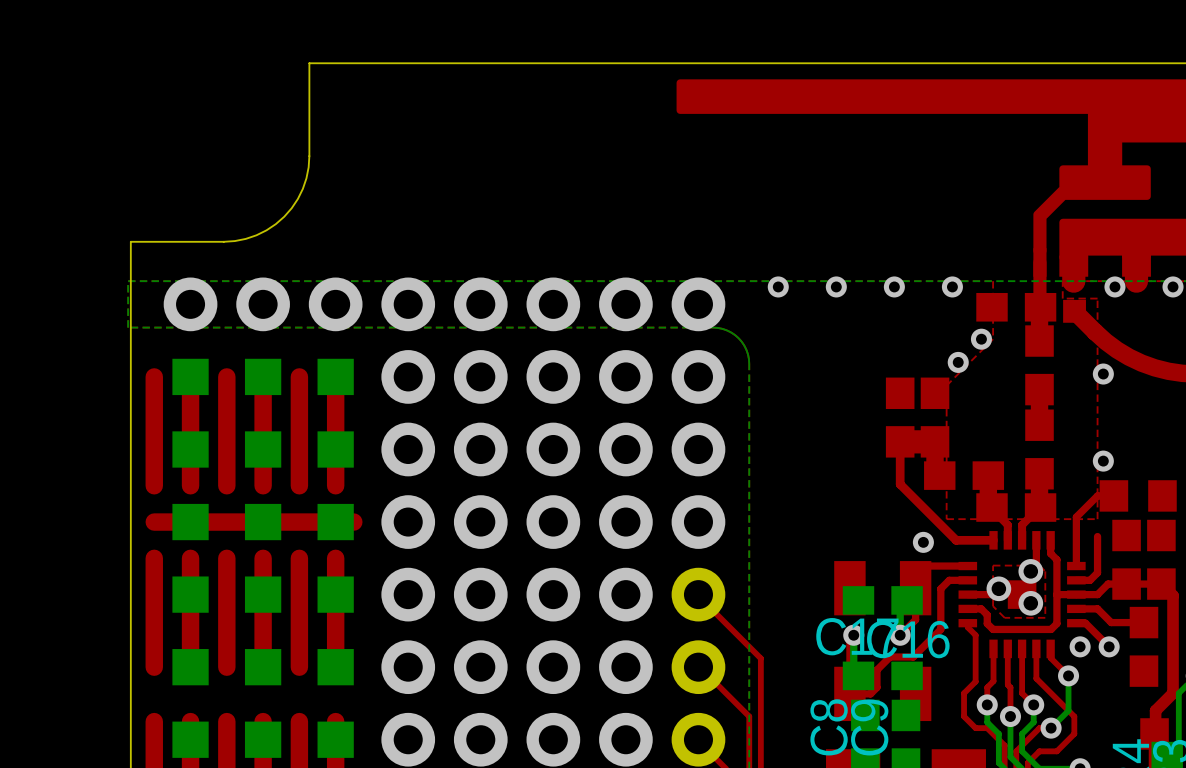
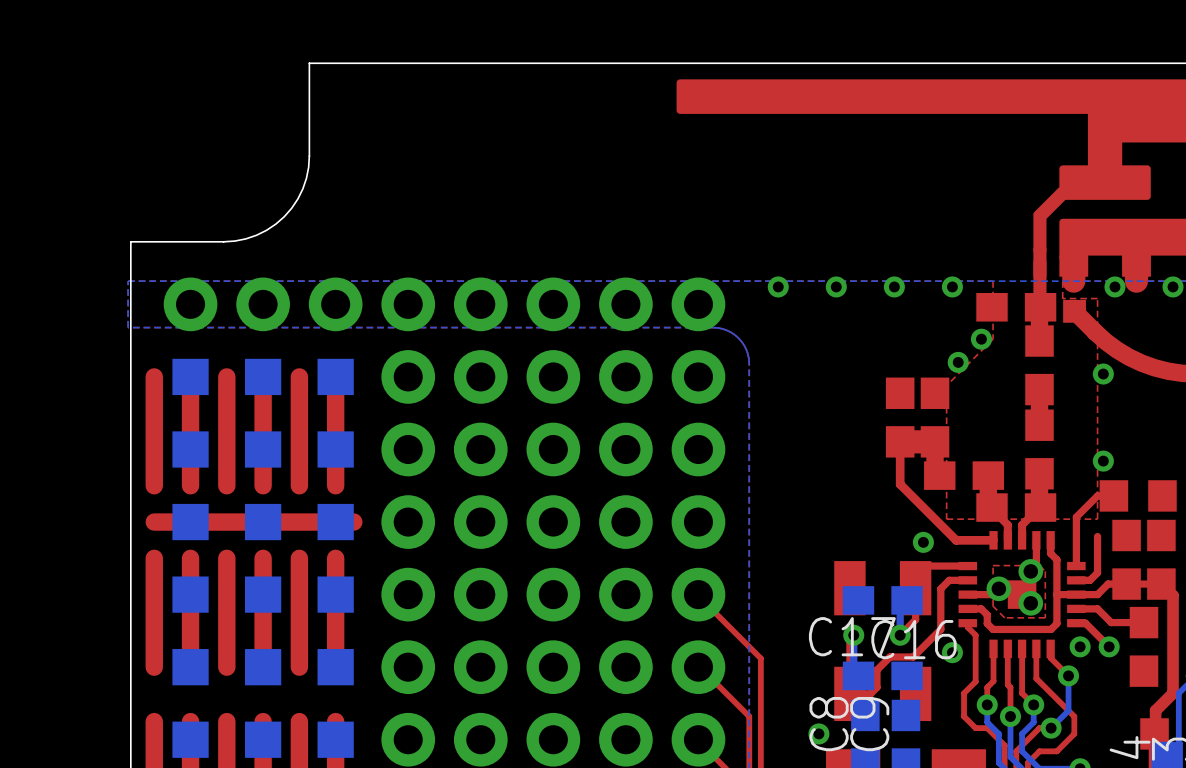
via: none -> (952, 652)
via: none -> (818, 733)

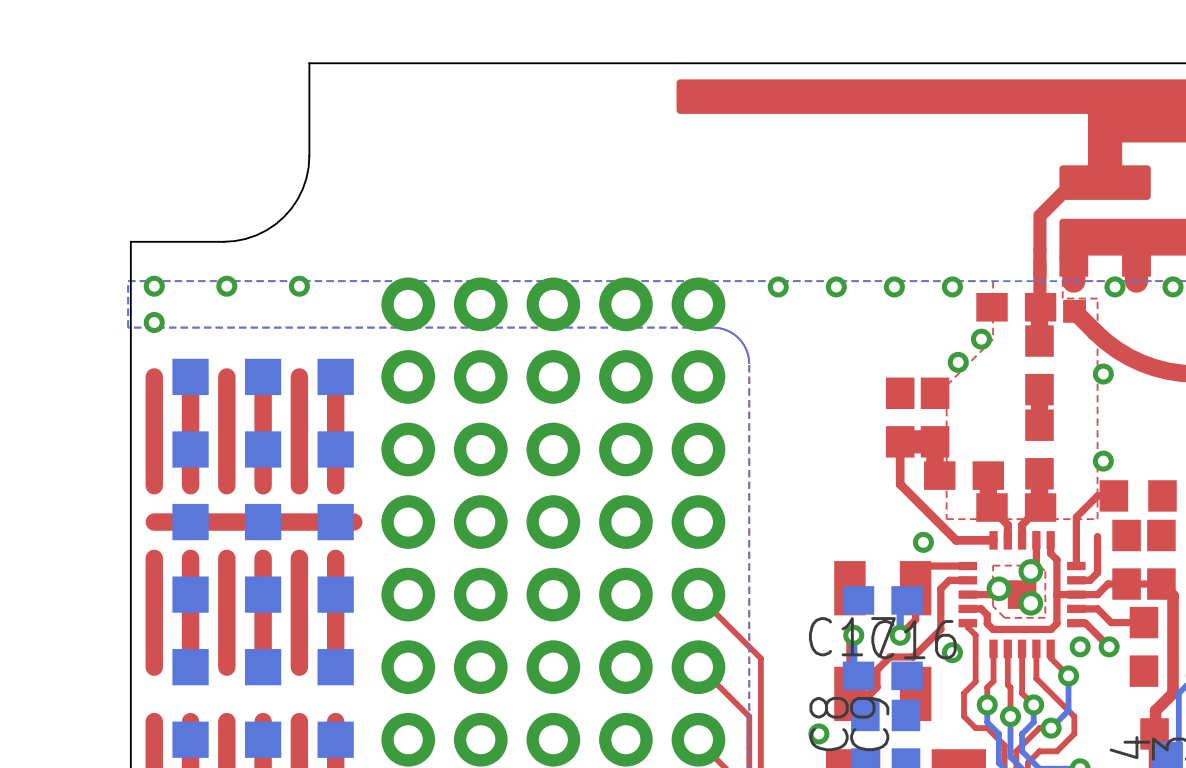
via: none -> (154, 286)
via: none -> (226, 286)
via: none -> (299, 286)
via: (190, 304) -> none
via: (263, 304) -> none
via: (335, 304) -> none
via: none -> (154, 322)

